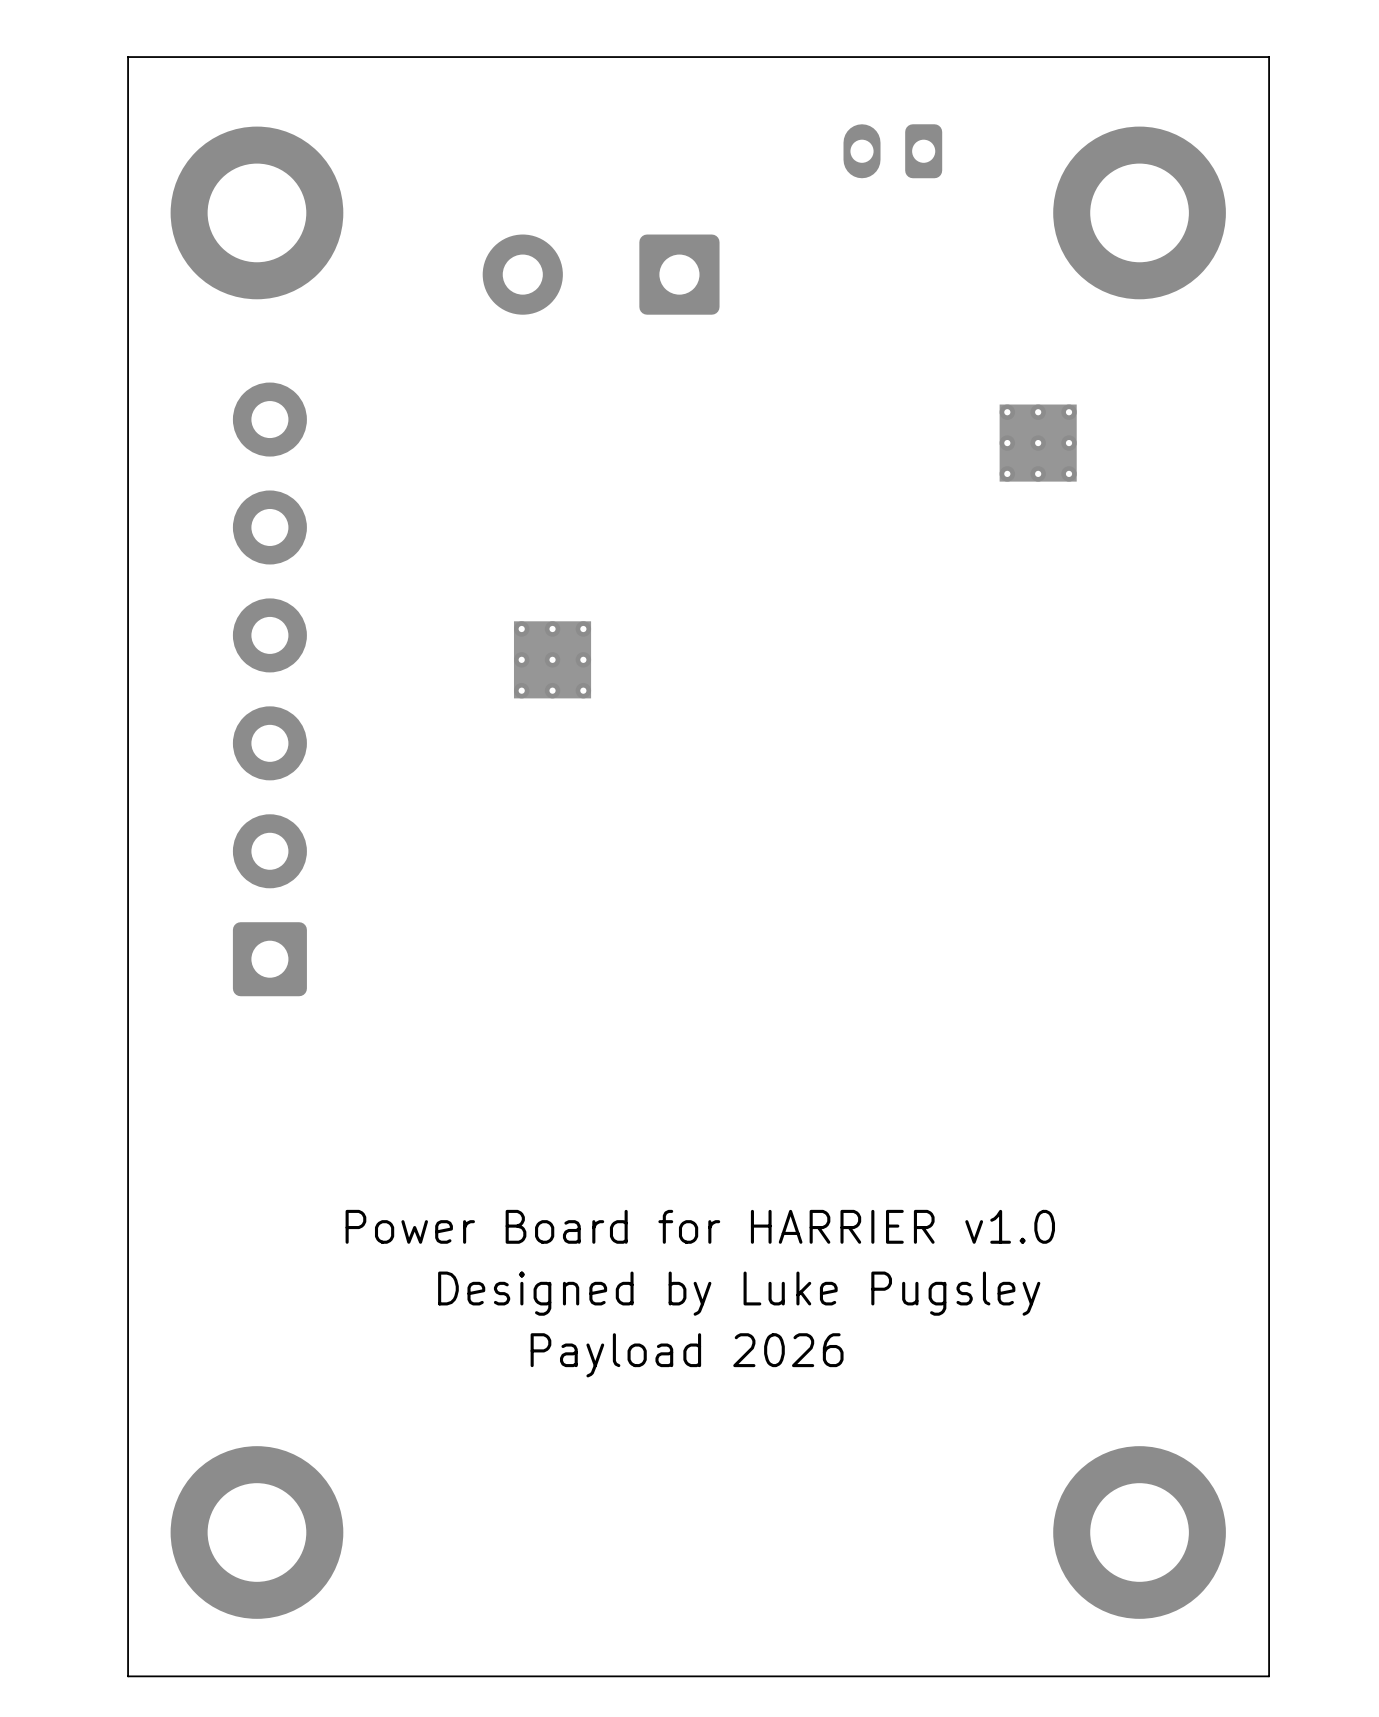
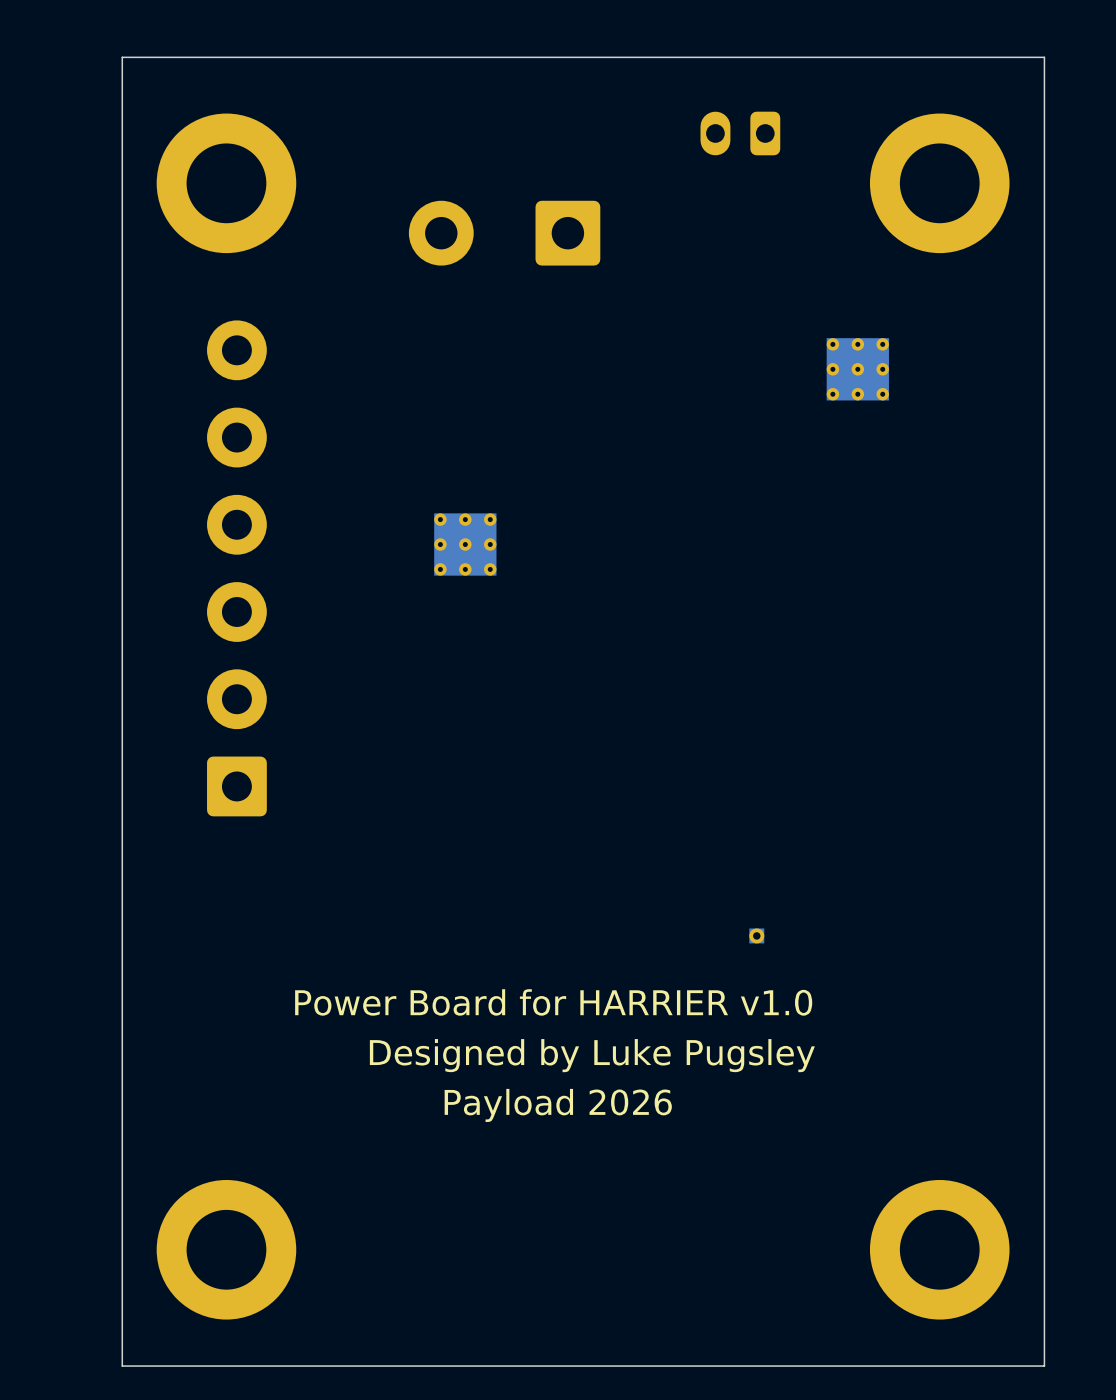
part: none -> (756, 935)

